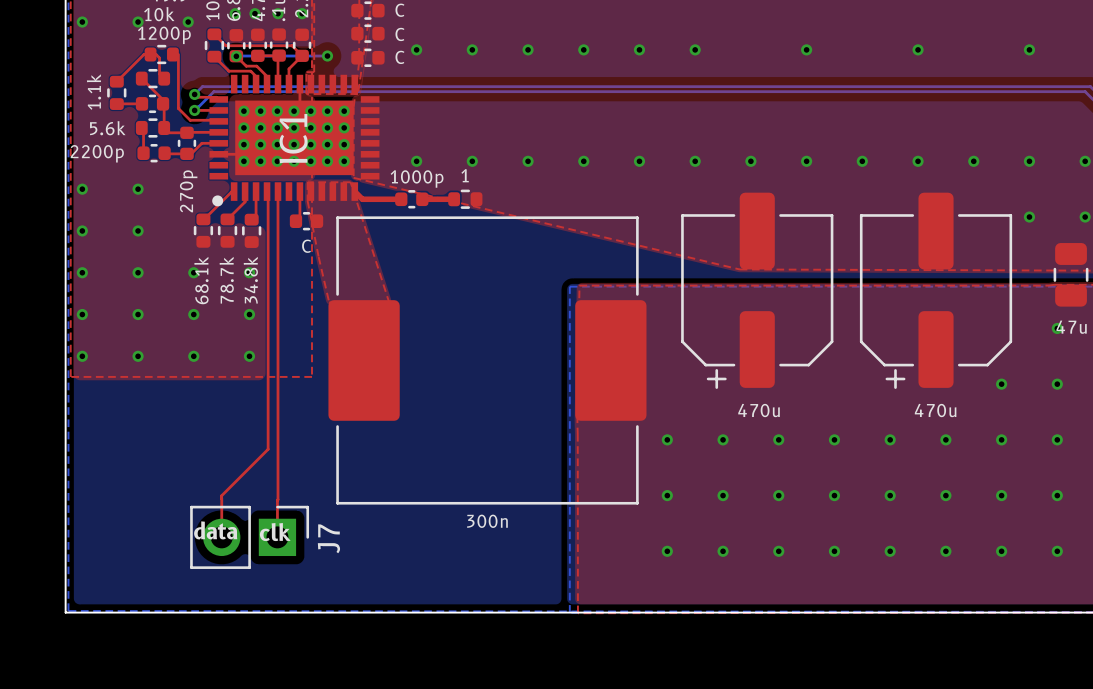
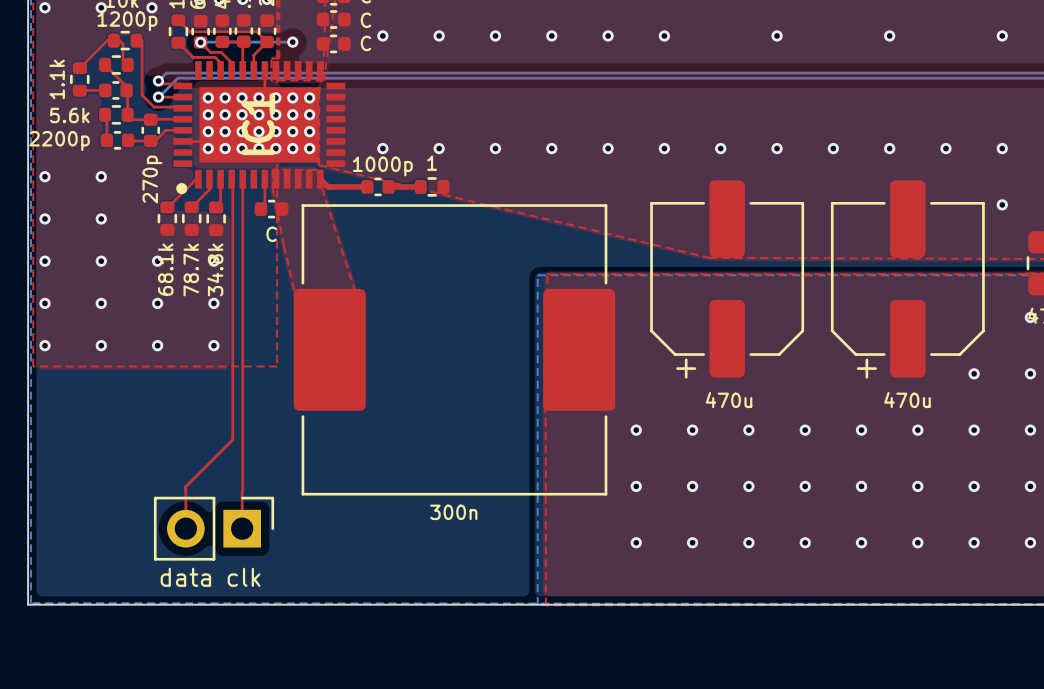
text position: data (215, 530) -> data (185, 577)
text position: clk (275, 532) -> clk (244, 577)
J7 name: J7 (328, 538) -> none

